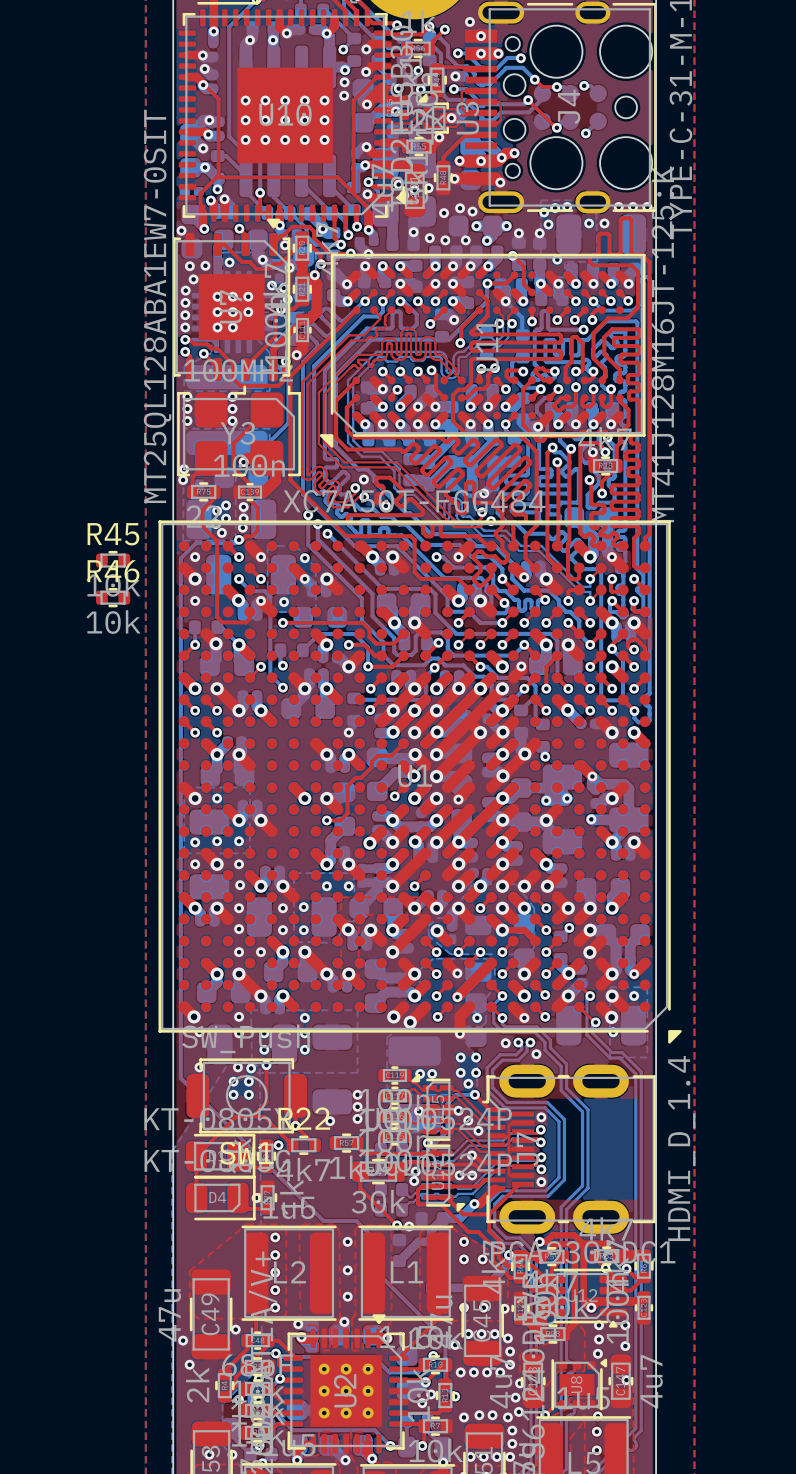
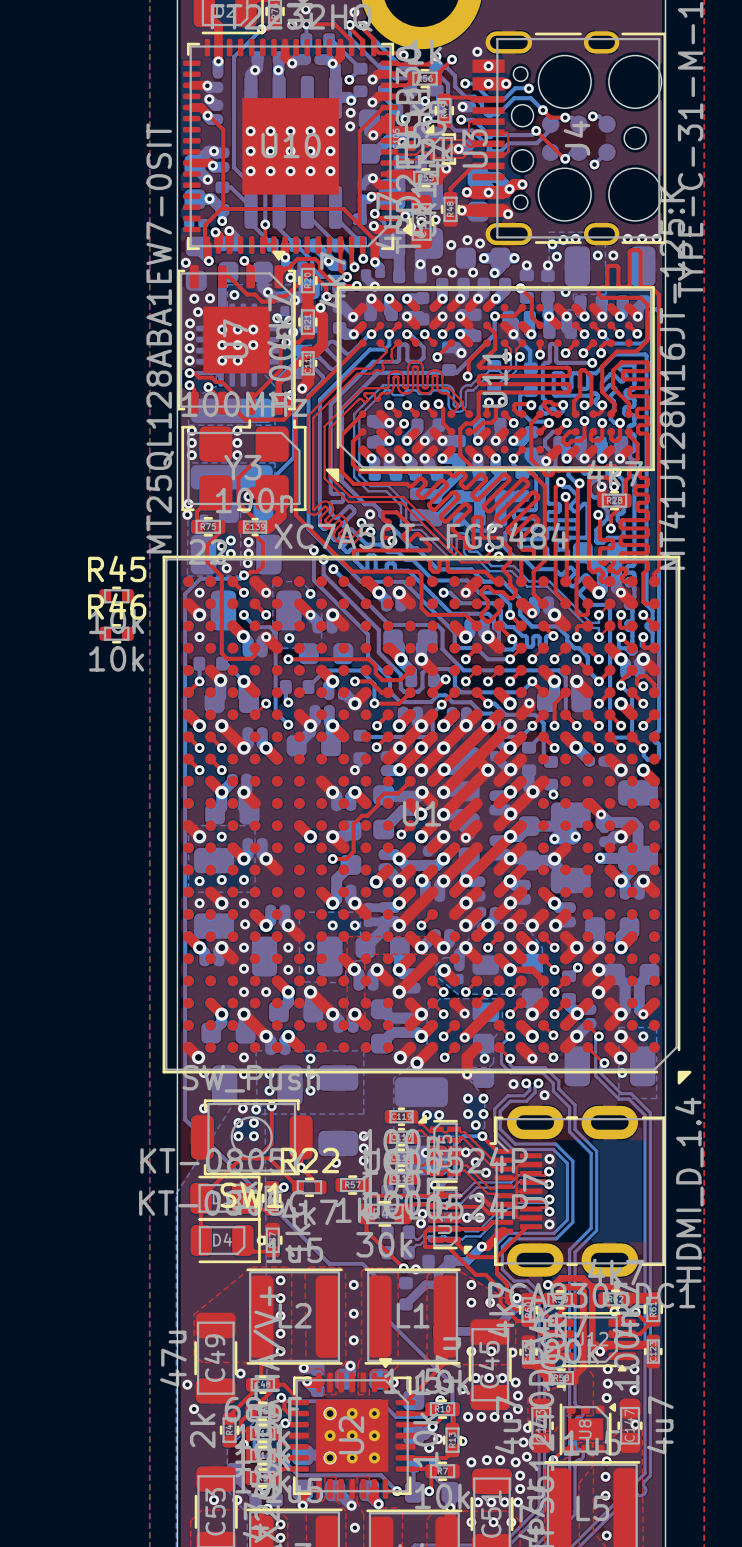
via: none -> (330, 1413)
via: none -> (330, 1457)

